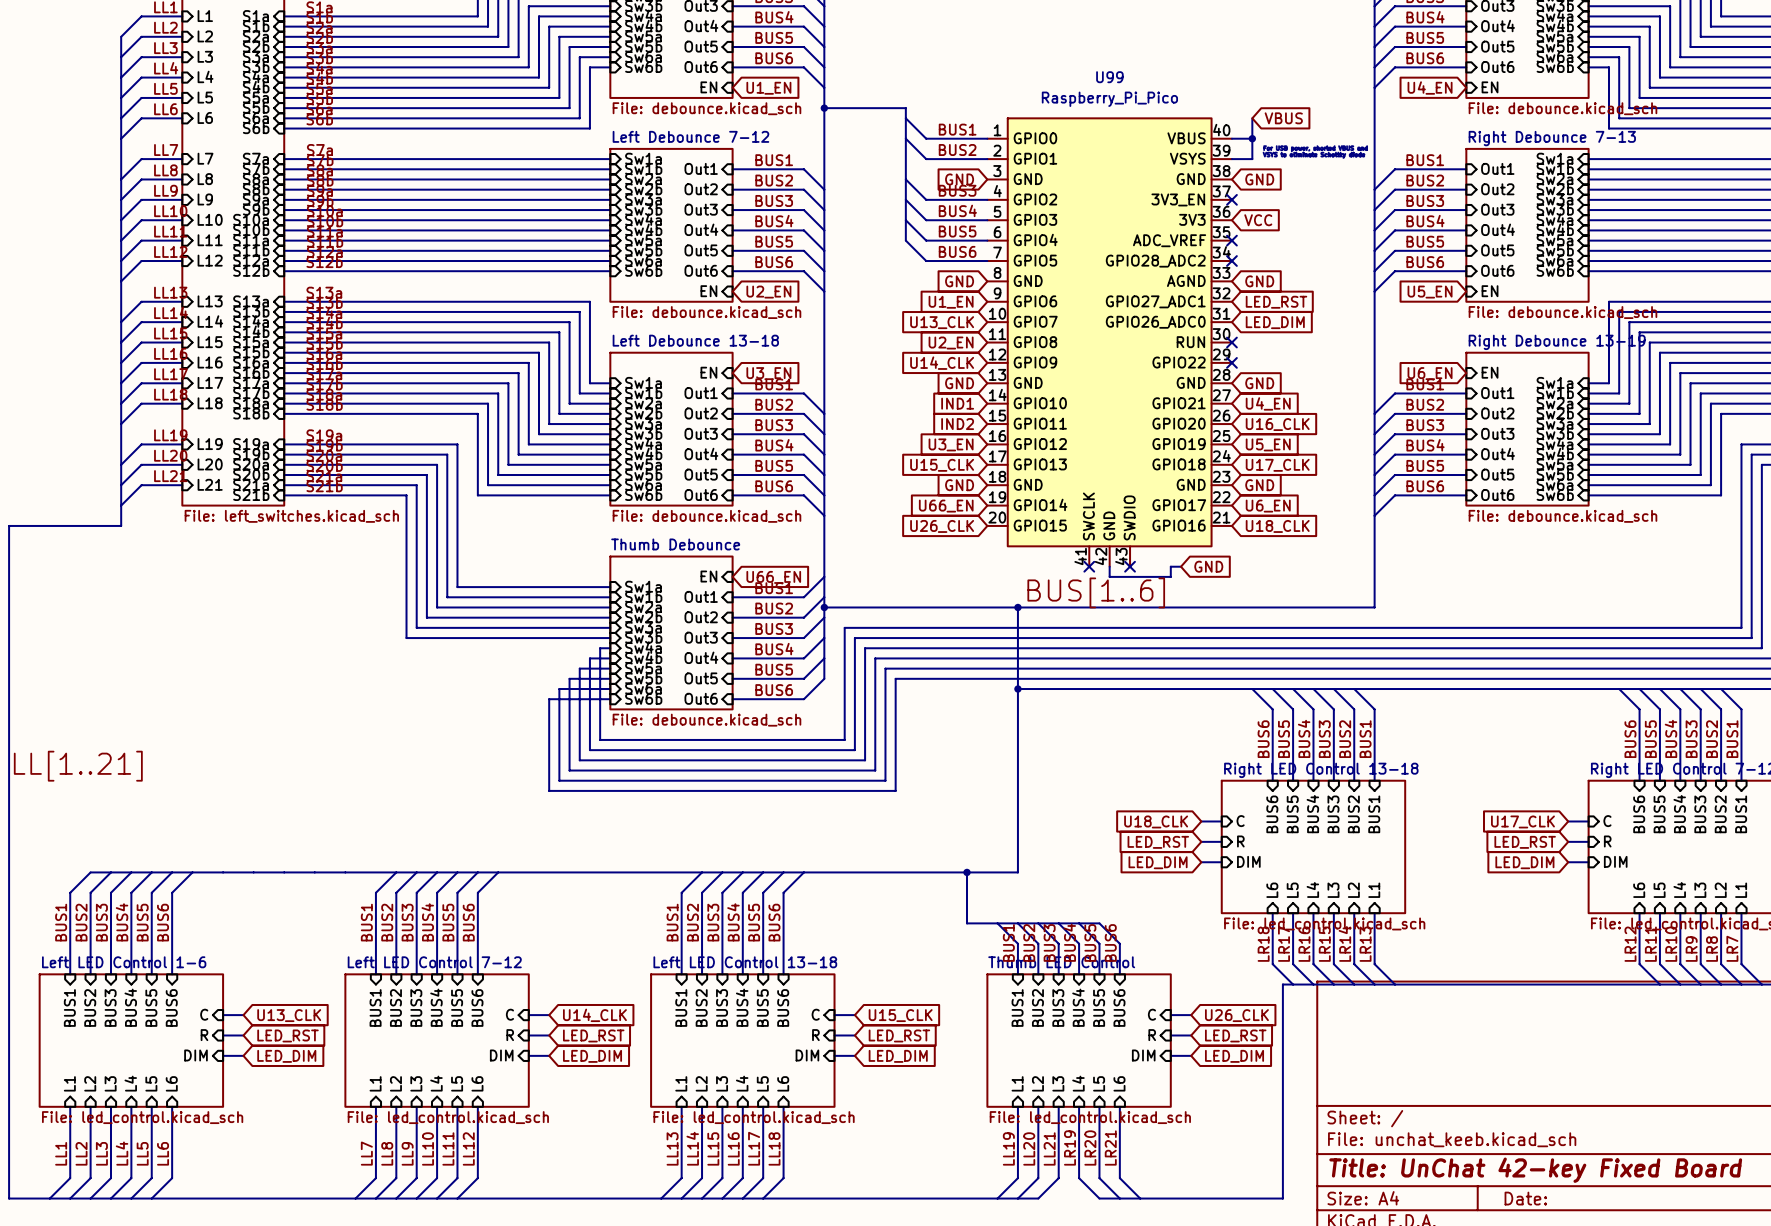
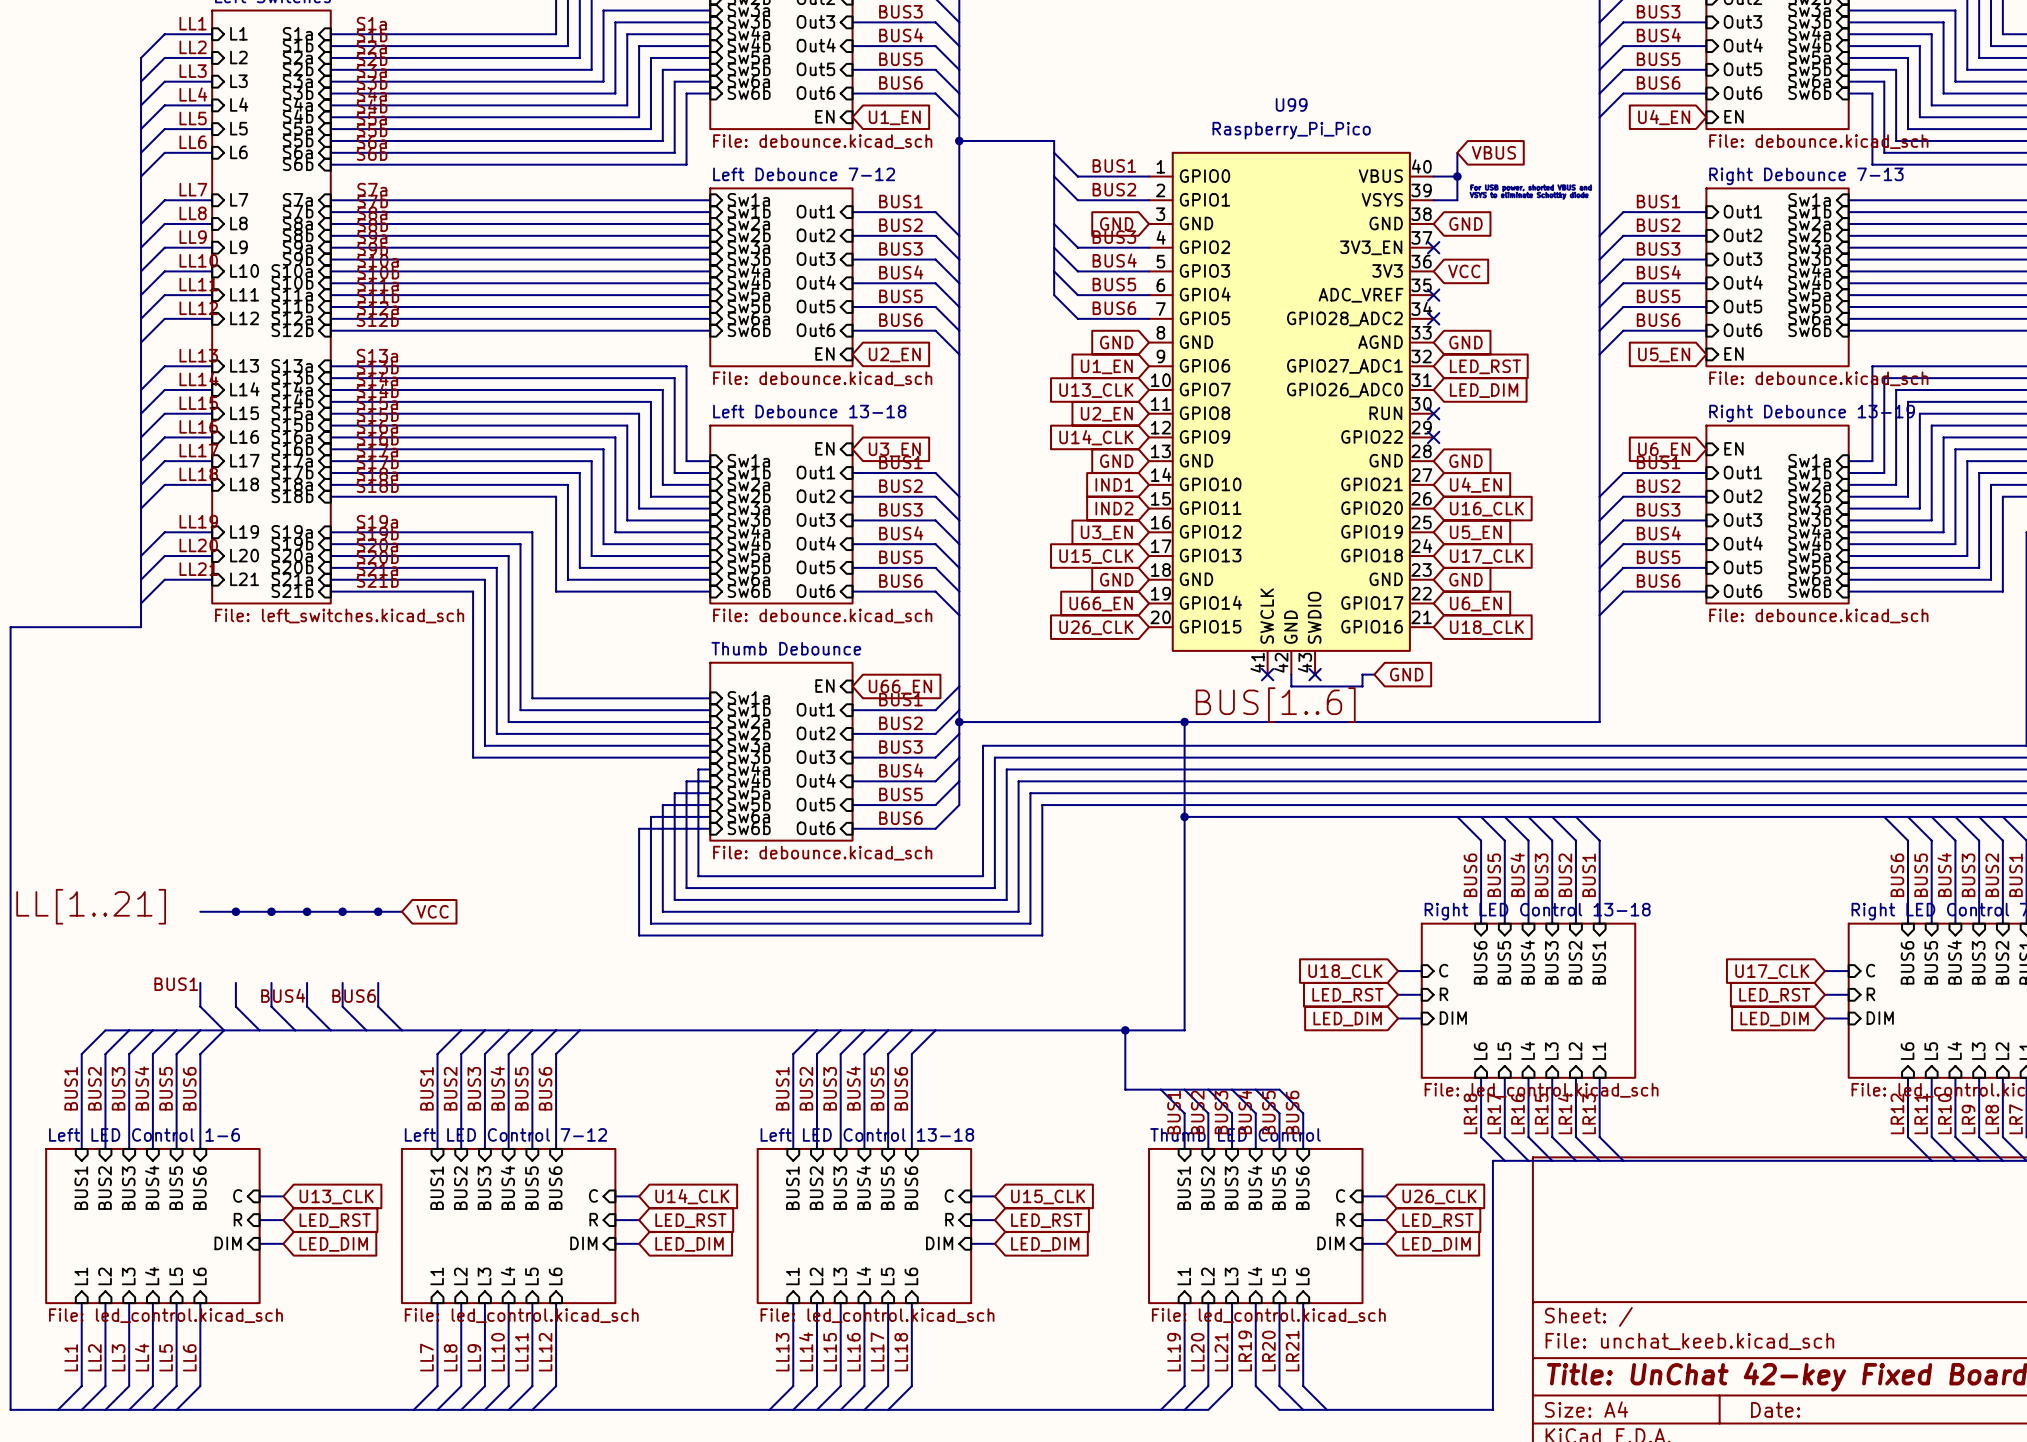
wire: none -> (200, 911) (401, 911)
junction: none -> (235, 911)
junction: none -> (271, 911)
junction: none -> (307, 911)
junction: none -> (342, 911)
junction: none -> (378, 911)
global label: none -> VCC (432, 911)
wire: none -> (200, 982) (200, 1006) (224, 1030)
wire: none -> (235, 982) (235, 1006) (259, 1030)
wire: none -> (271, 982) (271, 1006) (295, 1030)
wire: none -> (307, 982) (307, 1006) (330, 1030)
wire: none -> (342, 982) (342, 1006) (366, 1030)
wire: none -> (378, 982) (378, 1006) (401, 1030)
label: none -> BUS1 (176, 984)
label: none -> BUS4 (283, 995)
label: none -> BUS6 (354, 996)

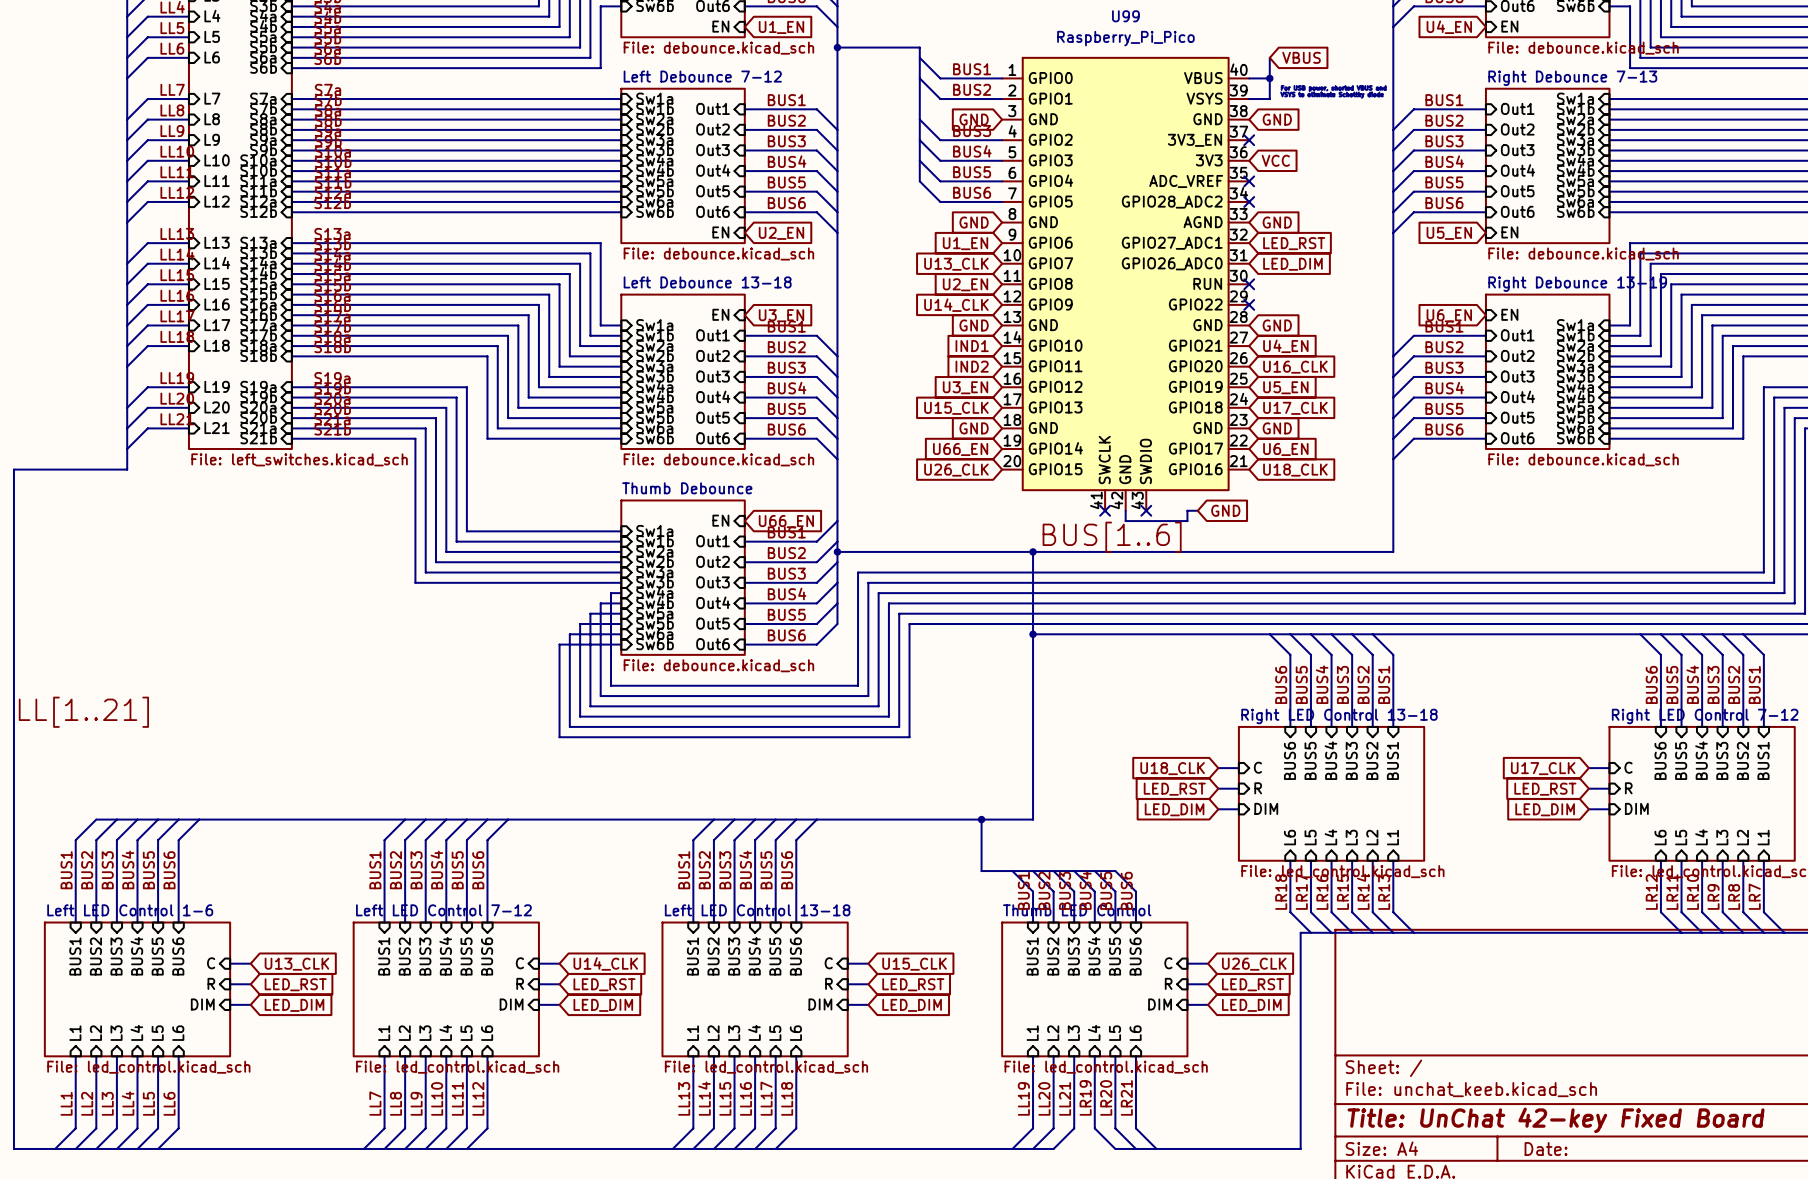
wire: (200, 911) (401, 911) -> none
junction: (235, 911) -> none
junction: (271, 911) -> none
junction: (307, 911) -> none
junction: (342, 911) -> none
junction: (378, 911) -> none
global label: VCC (432, 911) -> none
wire: (200, 982) (200, 1006) (224, 1030) -> none
wire: (235, 982) (235, 1006) (259, 1030) -> none
wire: (271, 982) (271, 1006) (295, 1030) -> none
wire: (307, 982) (307, 1006) (330, 1030) -> none
wire: (342, 982) (342, 1006) (366, 1030) -> none
wire: (378, 982) (378, 1006) (401, 1030) -> none
label: BUS1 (176, 984) -> none
label: BUS4 (283, 995) -> none
label: BUS6 (354, 996) -> none

